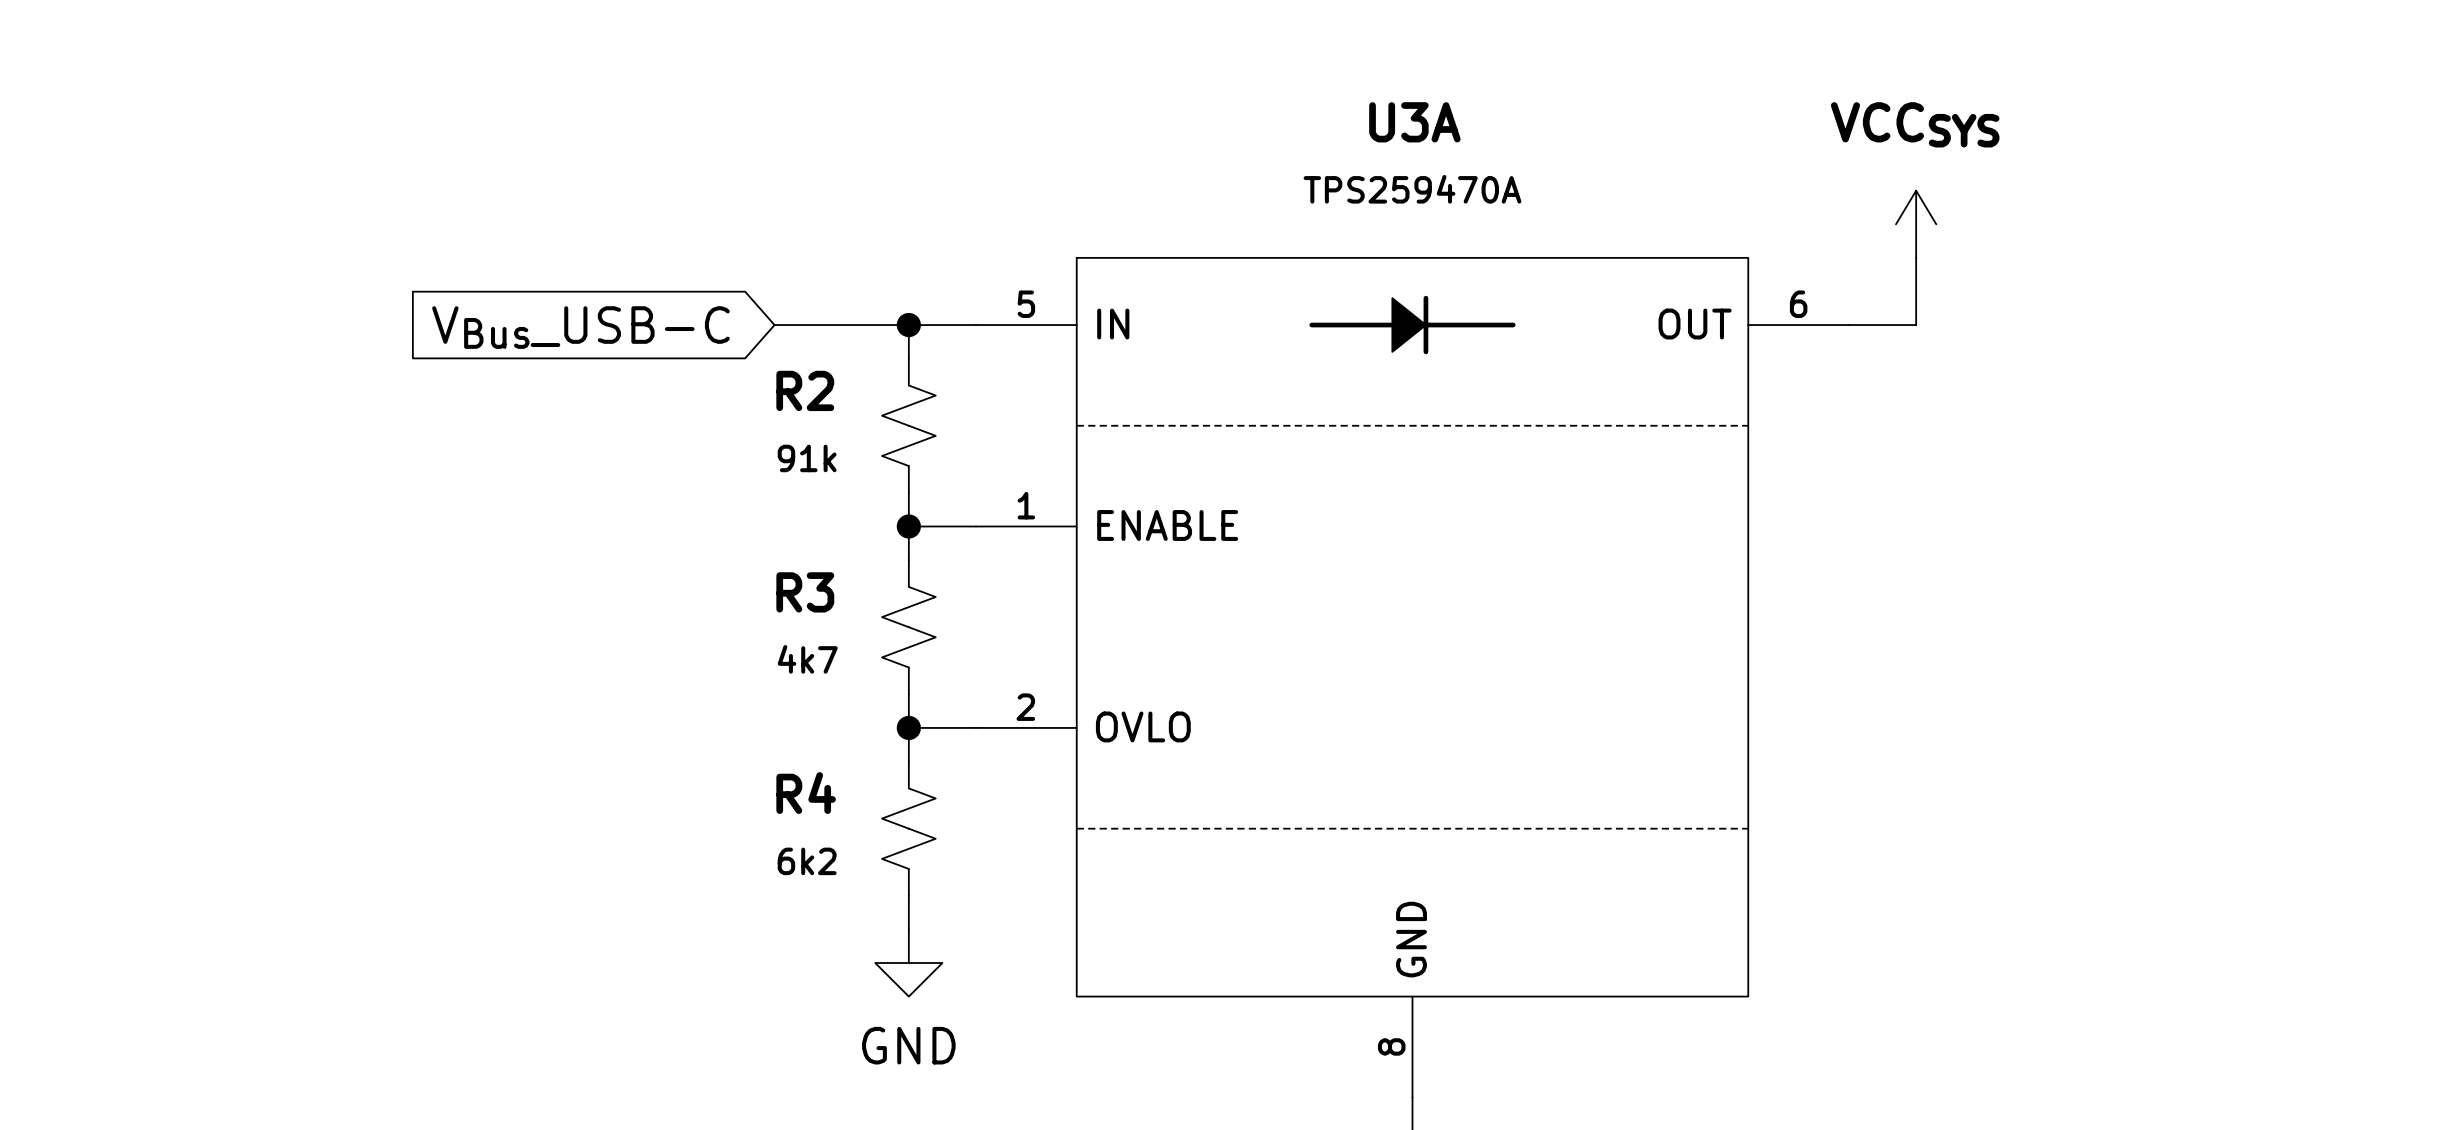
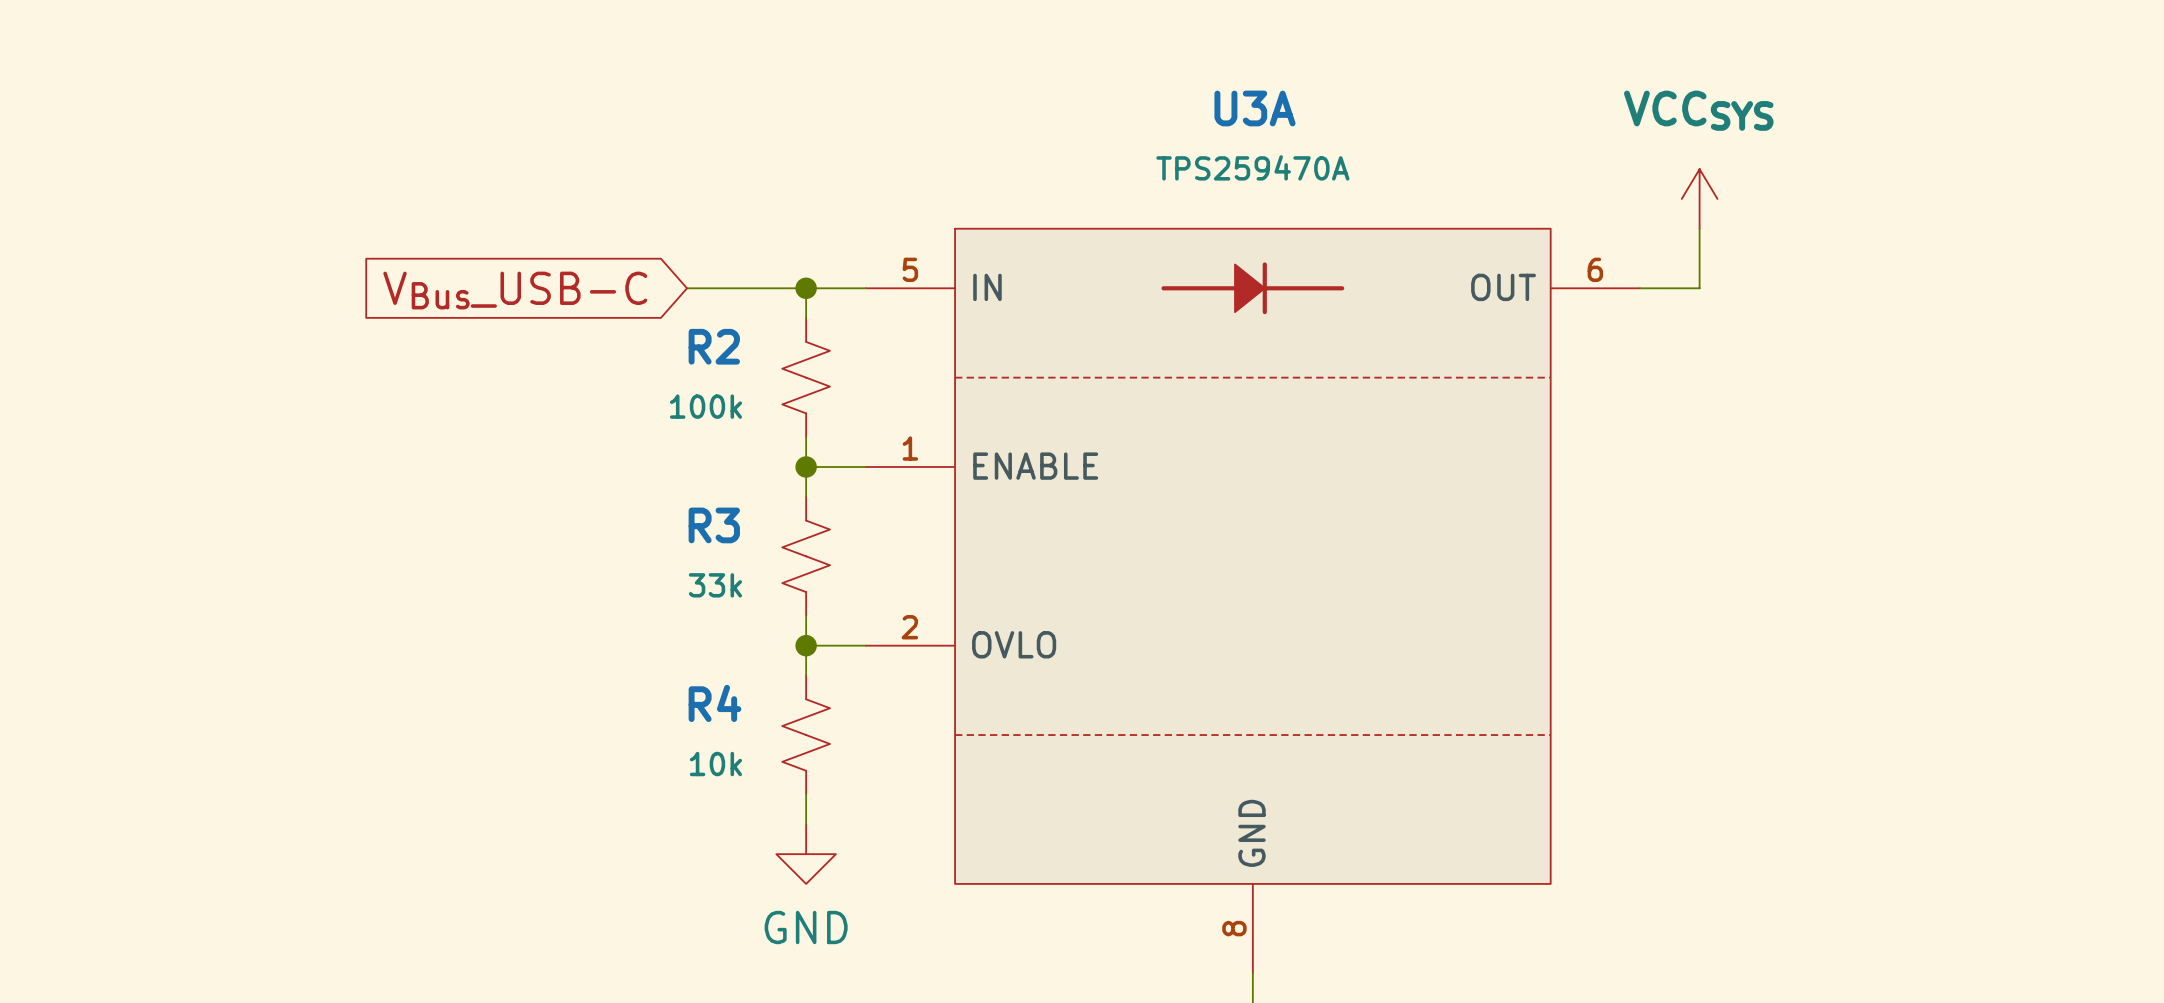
R2 value: 91k (807, 458) -> 100k (706, 406)
R3 value: 4k7 (807, 659) -> 33k (715, 585)
R4 value: 6k2 (807, 861) -> 10k (715, 764)

